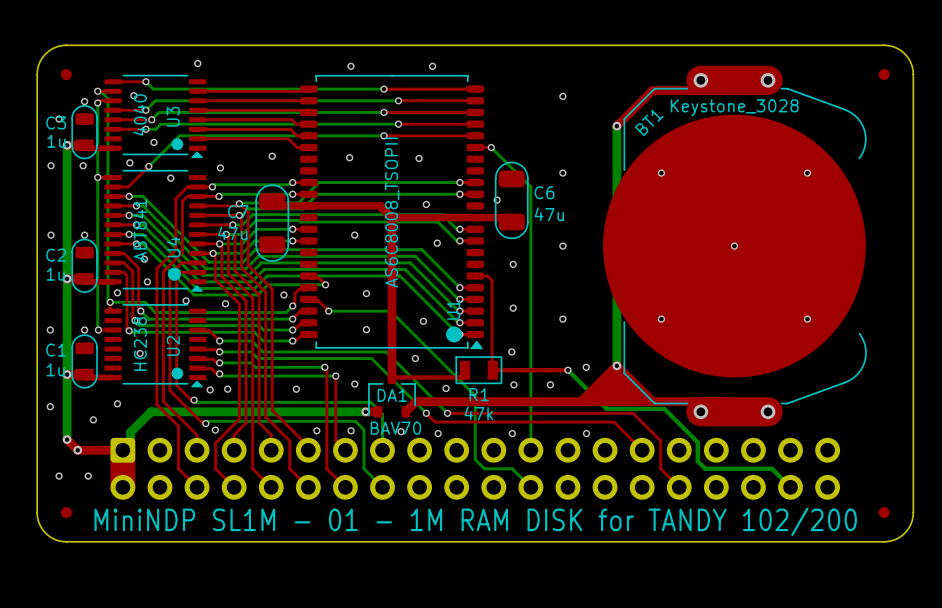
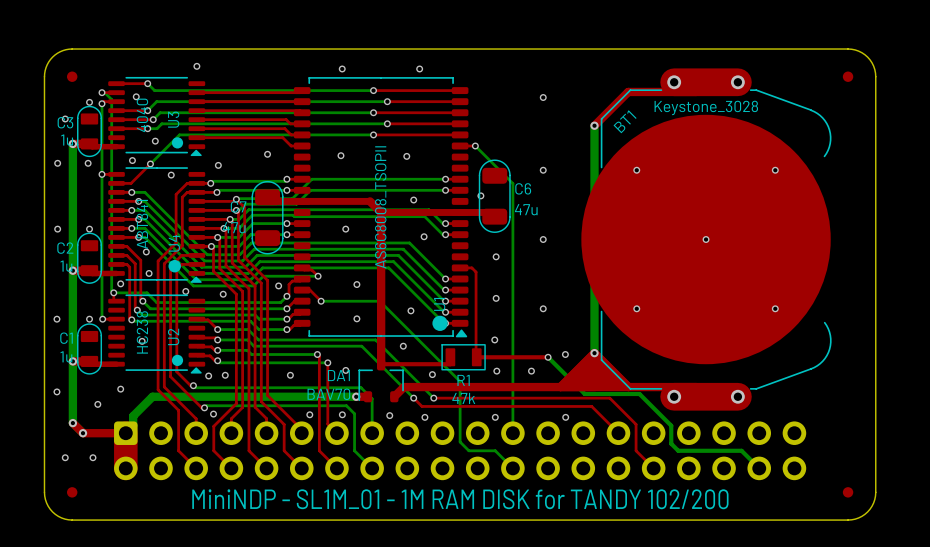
DA1 name position: DA1 (392, 395) -> DA1 (338, 375)
DA1 value position: BAV70 (395, 428) -> BAV70 (328, 394)
text: MiniNDP SL1M - 01 - 1M RAM DISK for TANDY 102/200 (475, 521) -> MiniNDP - SL1M_01 - 1M RAM DISK for TANDY 102/200 (460, 499)

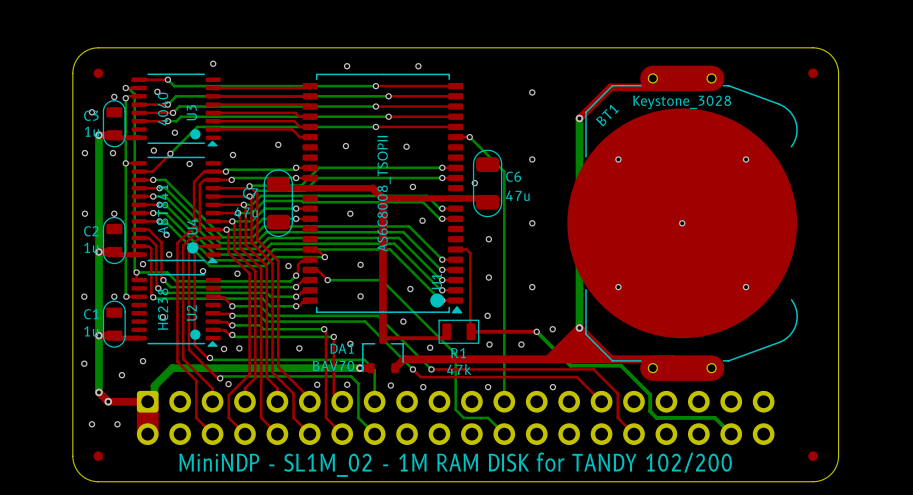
via: (674, 82) -> none
part: none -> (652, 78)
via: (737, 82) -> none
part: none -> (711, 78)
via: (674, 396) -> none
part: none -> (652, 368)
via: (737, 396) -> none
part: none -> (711, 368)
text: MiniNDP - SL1M_01 - 1M RAM DISK for TANDY 102/200 (460, 499) -> MiniNDP - SL1M_02 - 1M RAM DISK for TANDY 102/200 (455, 464)

